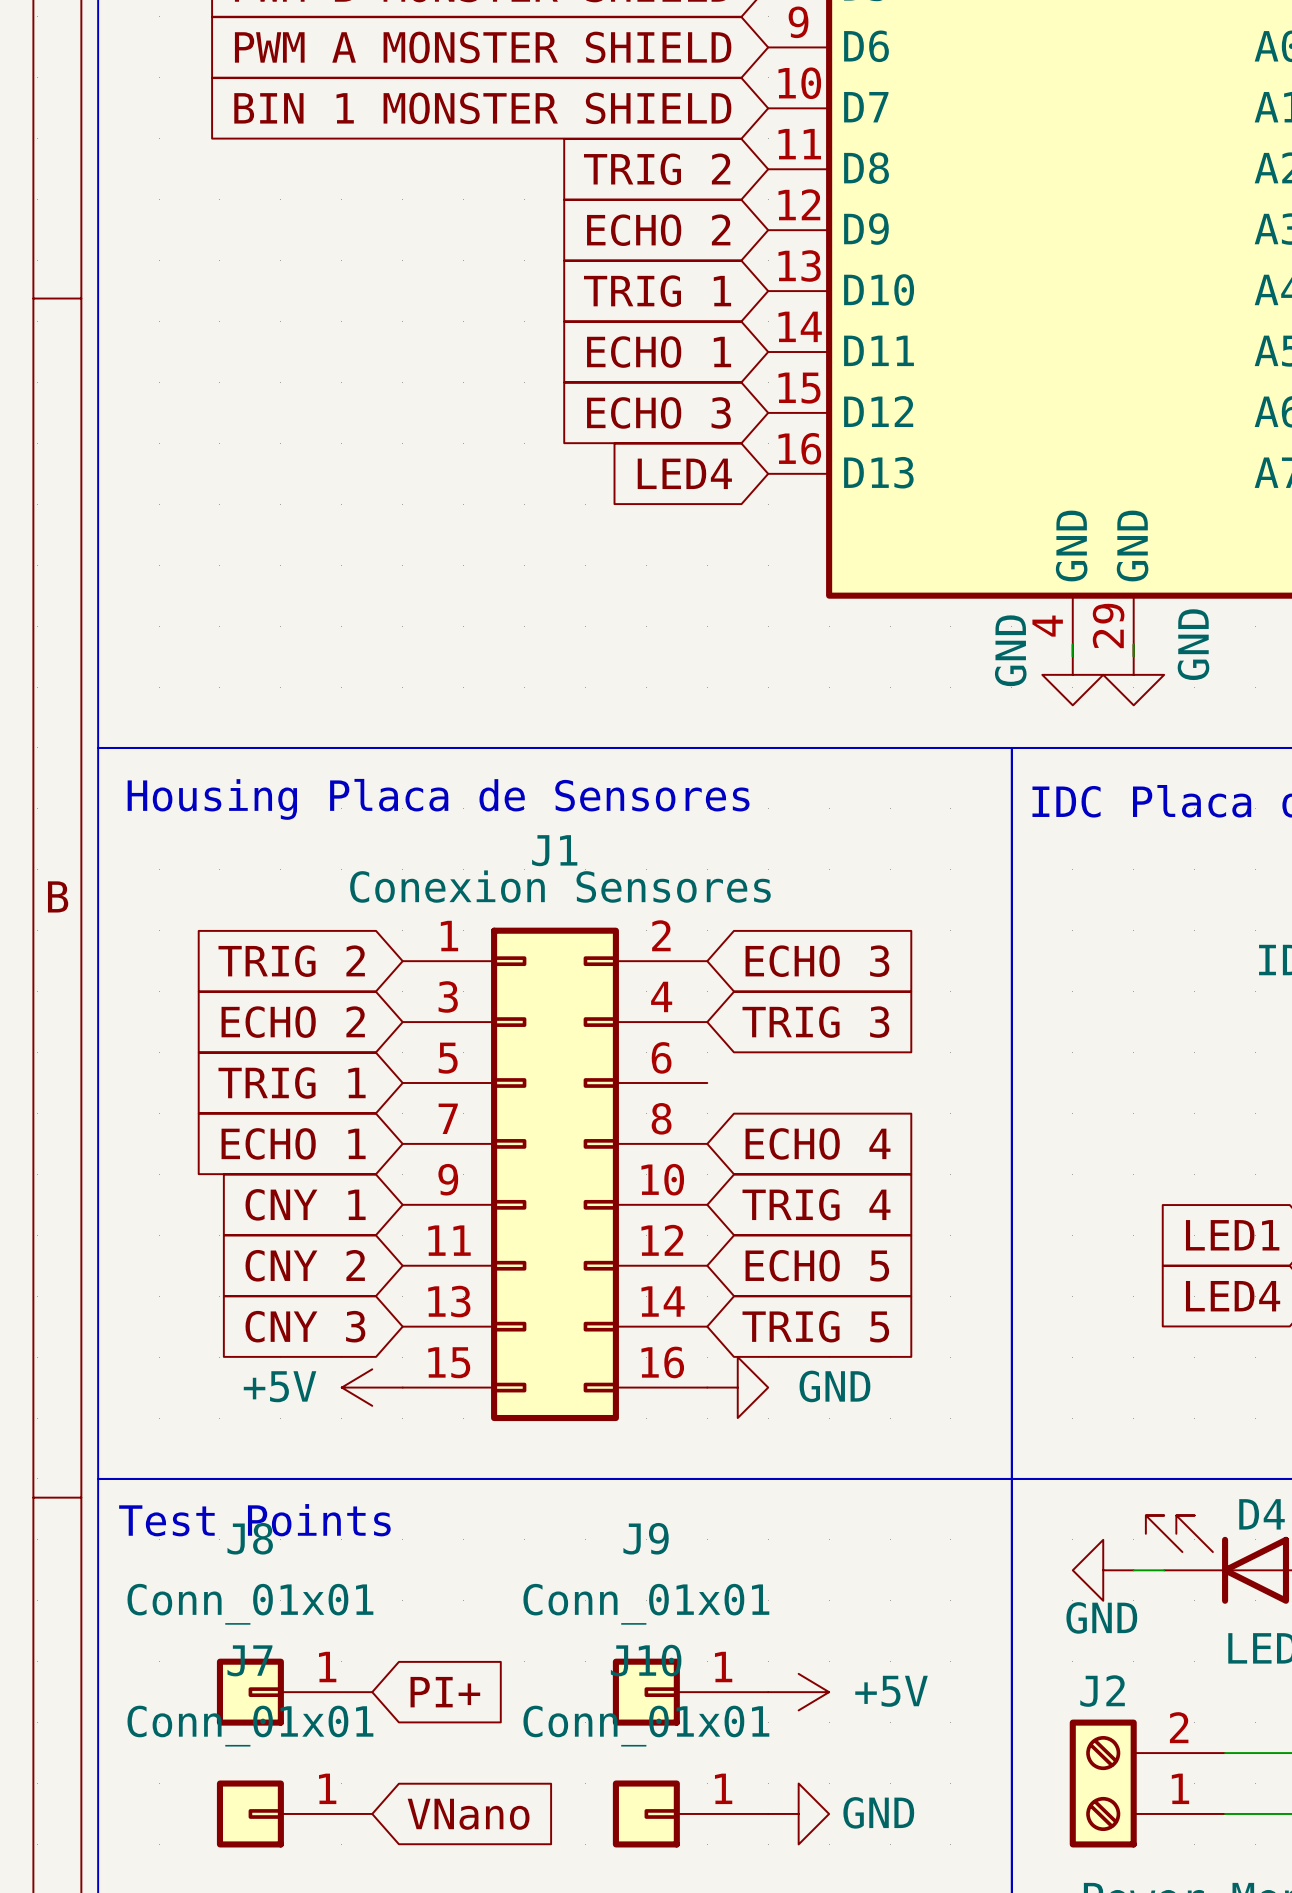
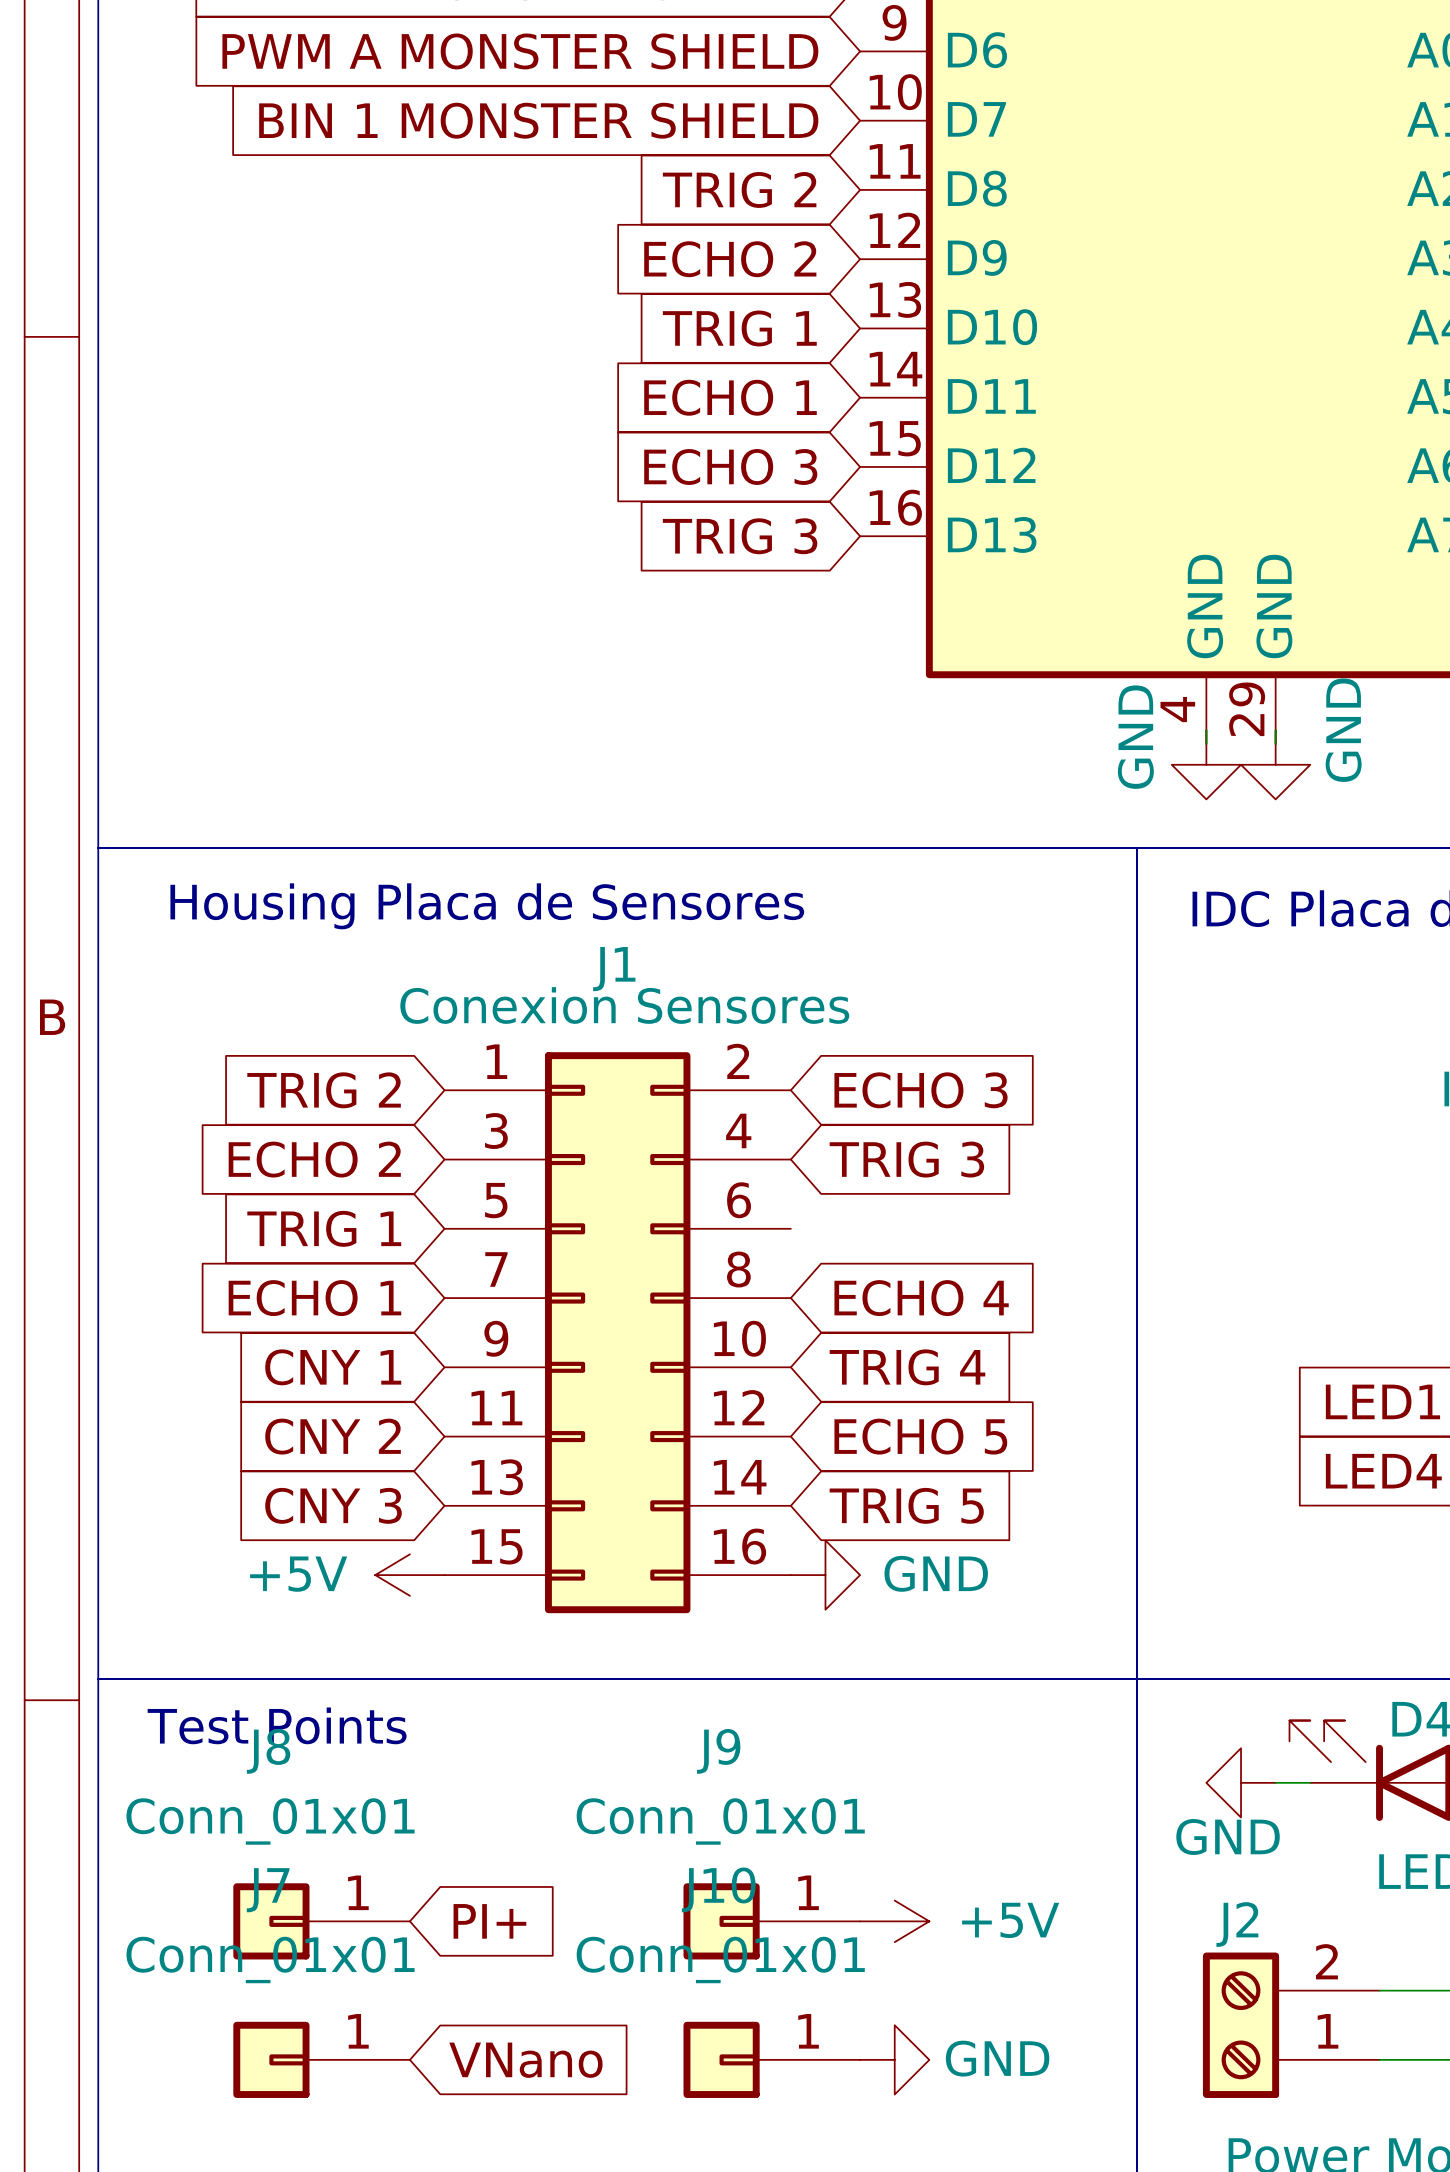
global label: LED4 (684, 473) -> TRIG 3 (740, 536)

